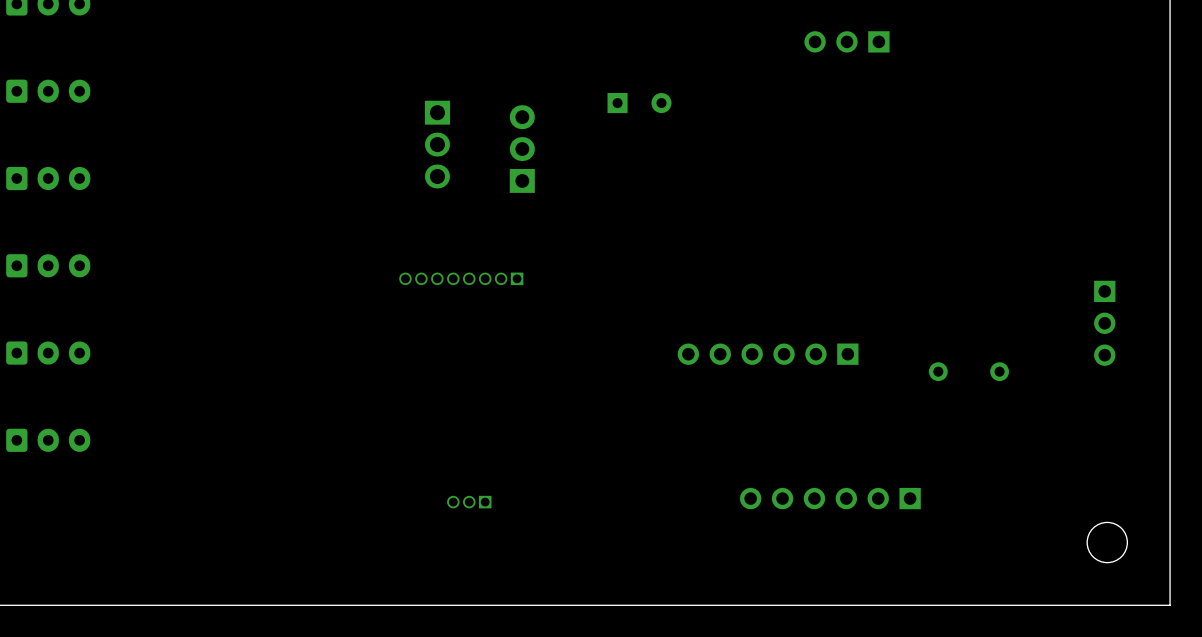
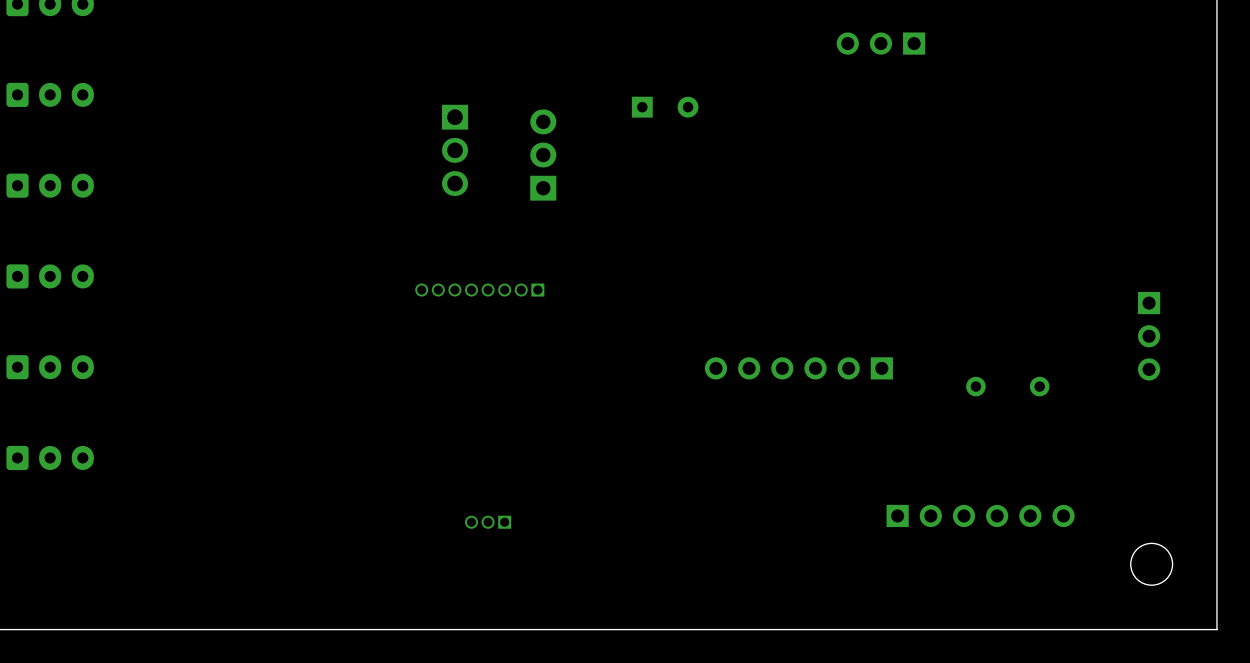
part rotation: 0° (830, 498) -> 180° (980, 515)
part position: (830, 498) -> (980, 515)

